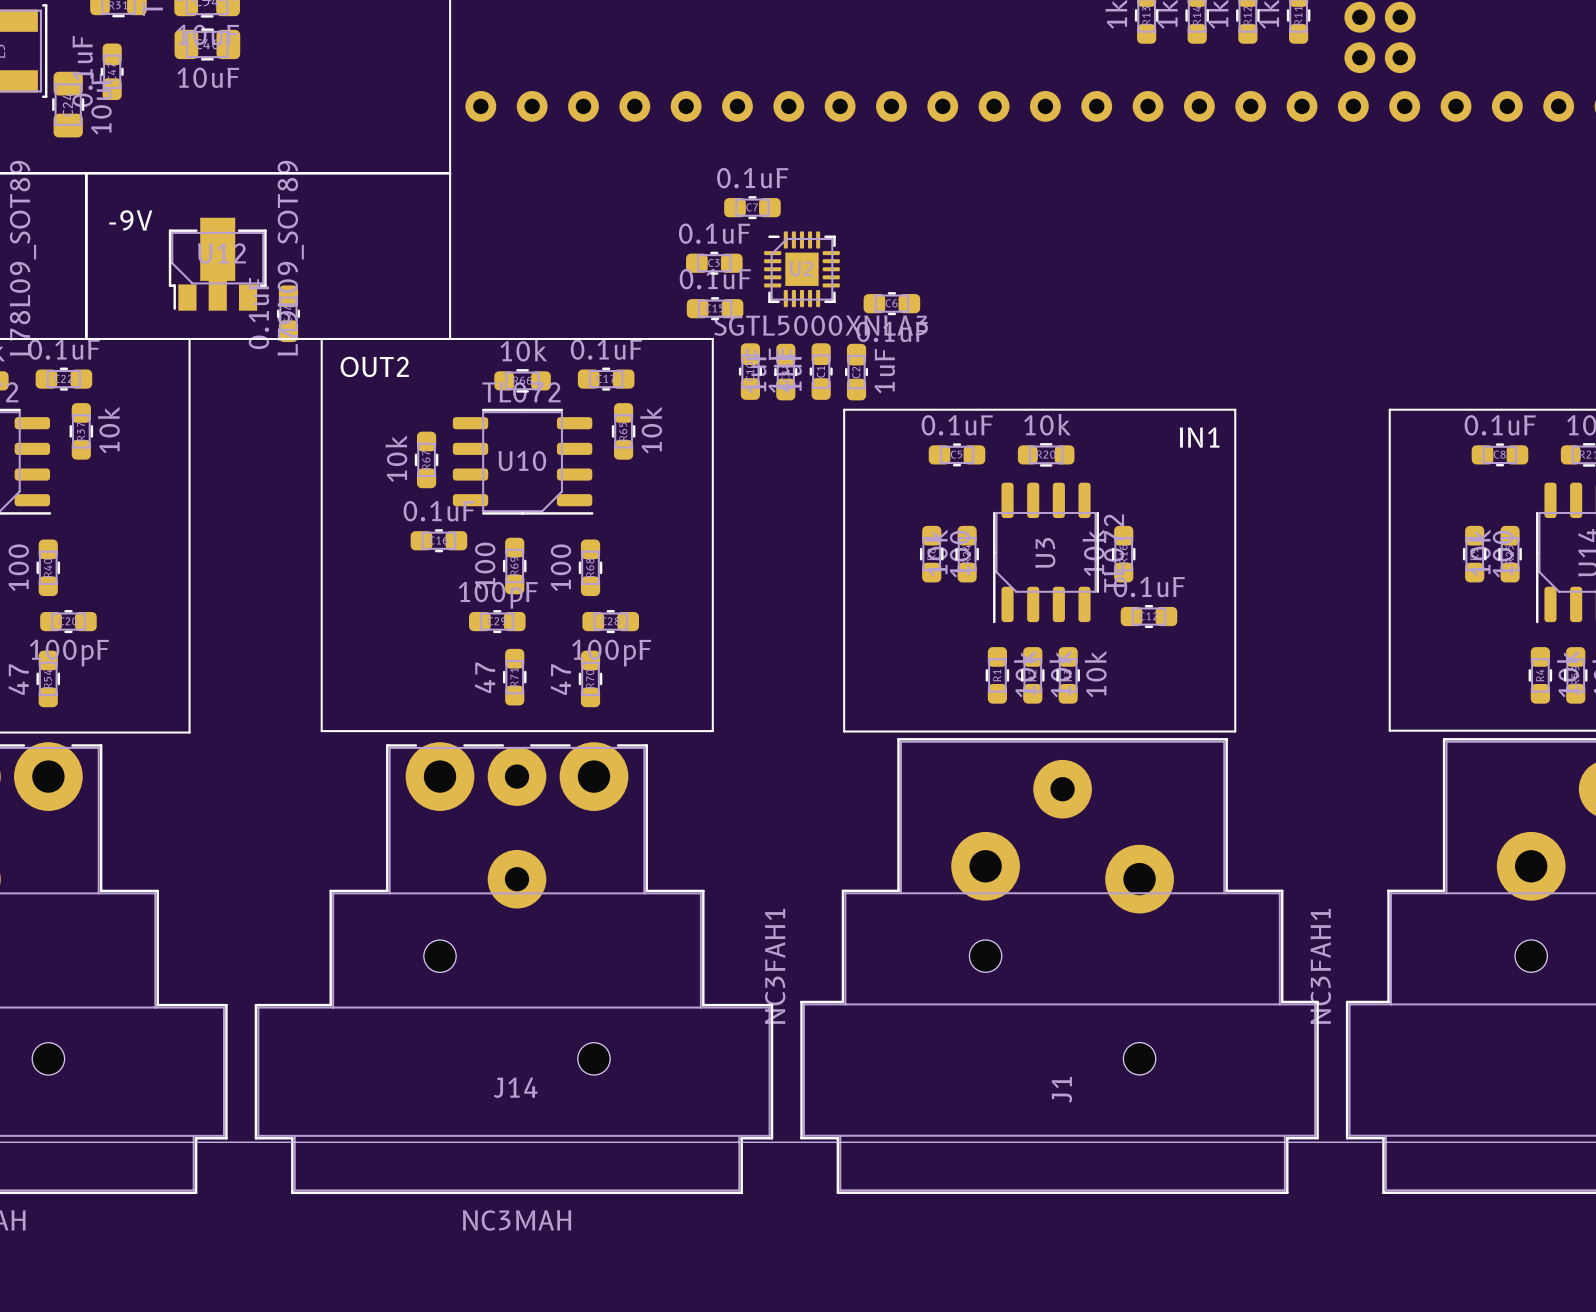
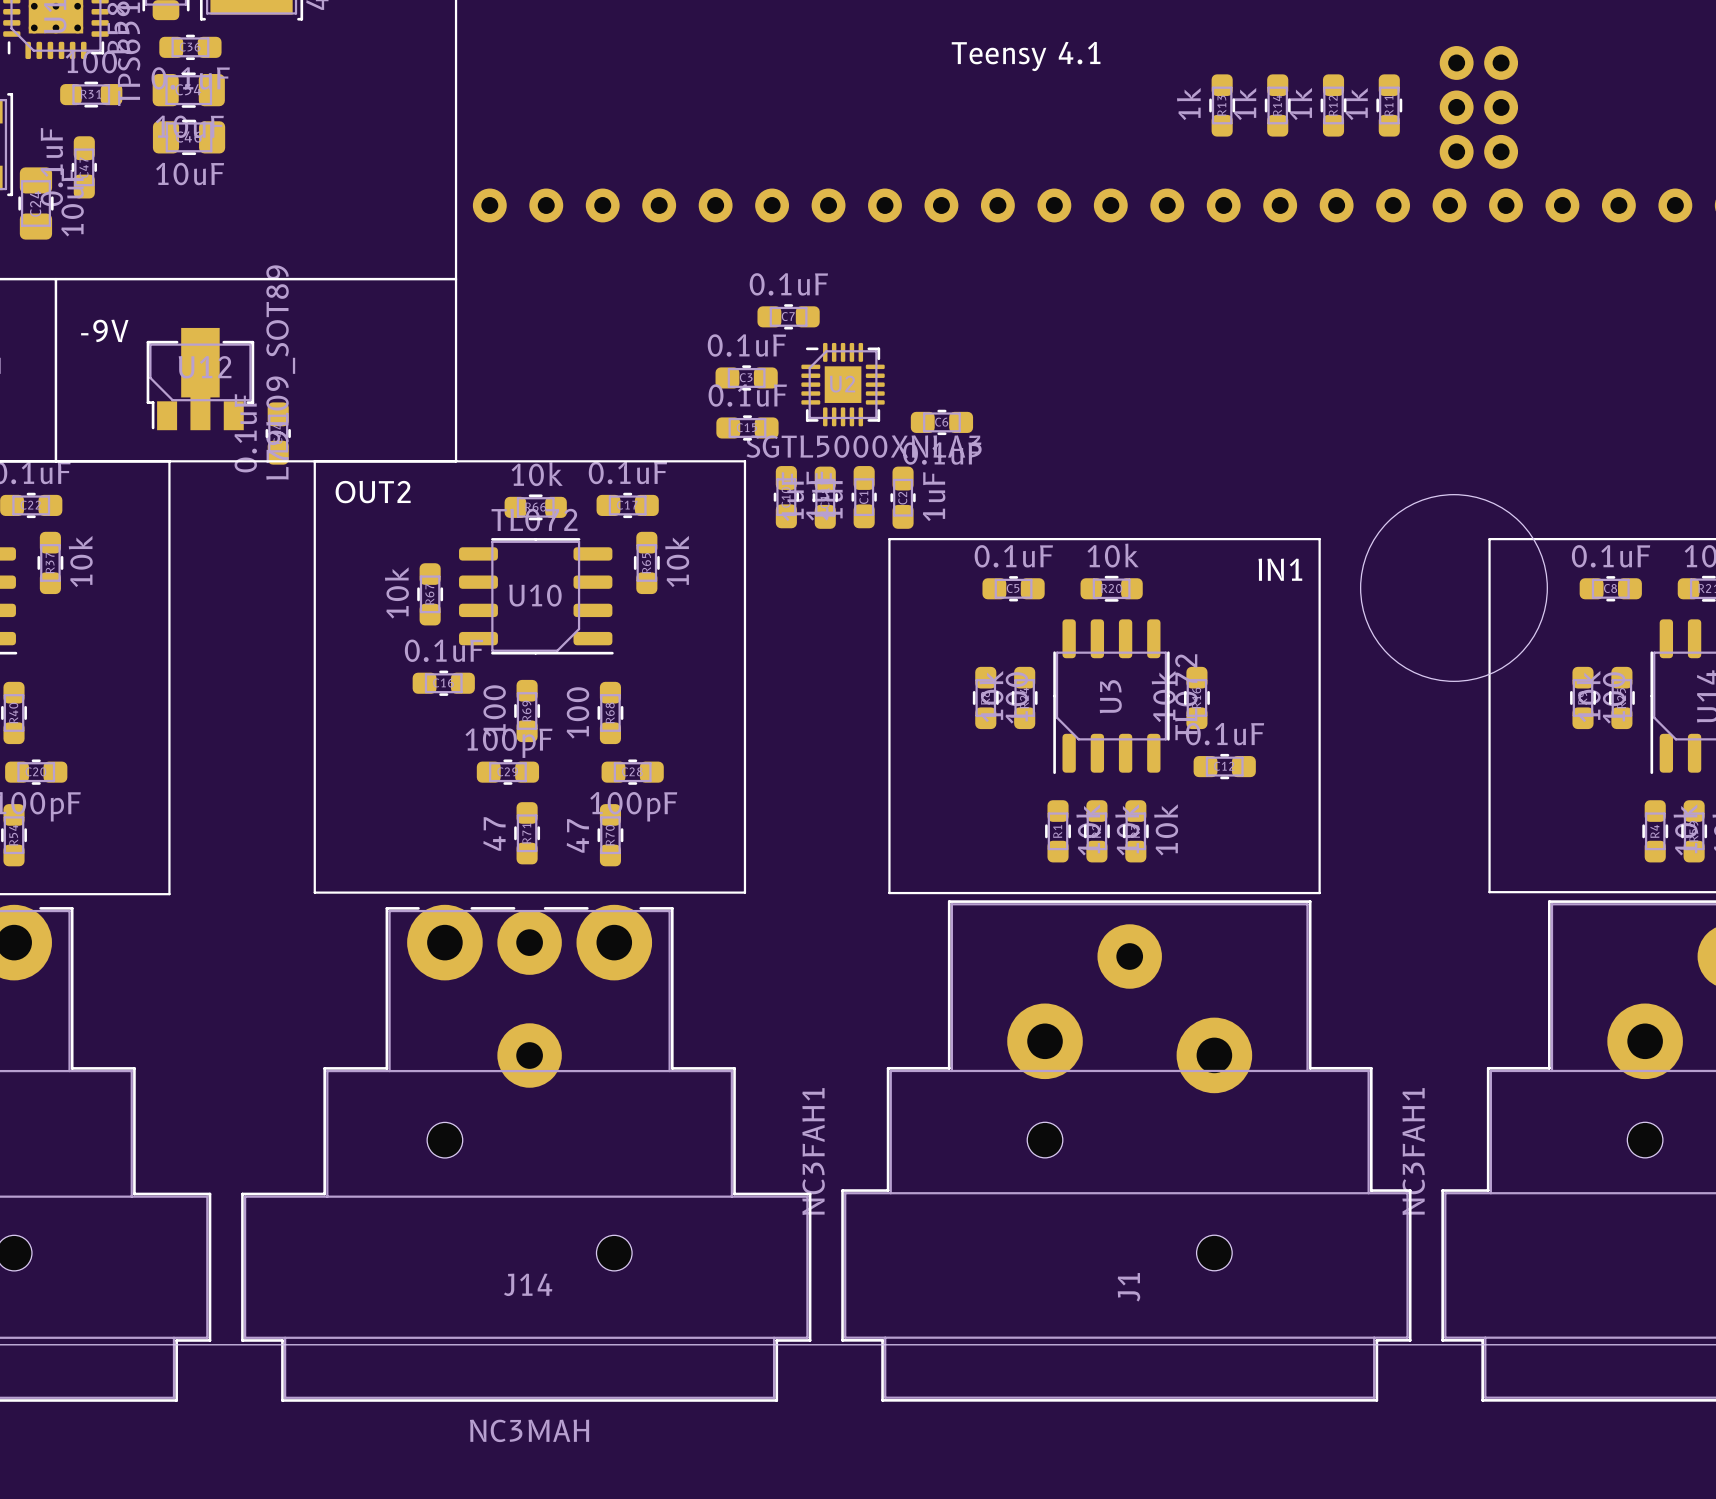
round board edge: none -> [1360, 494, 1548, 682]

